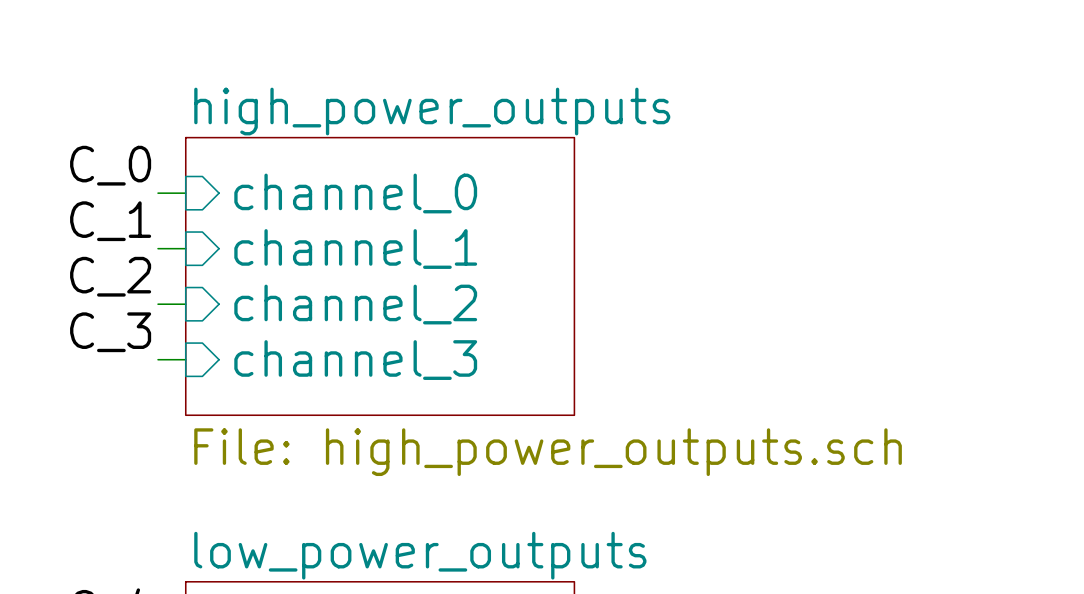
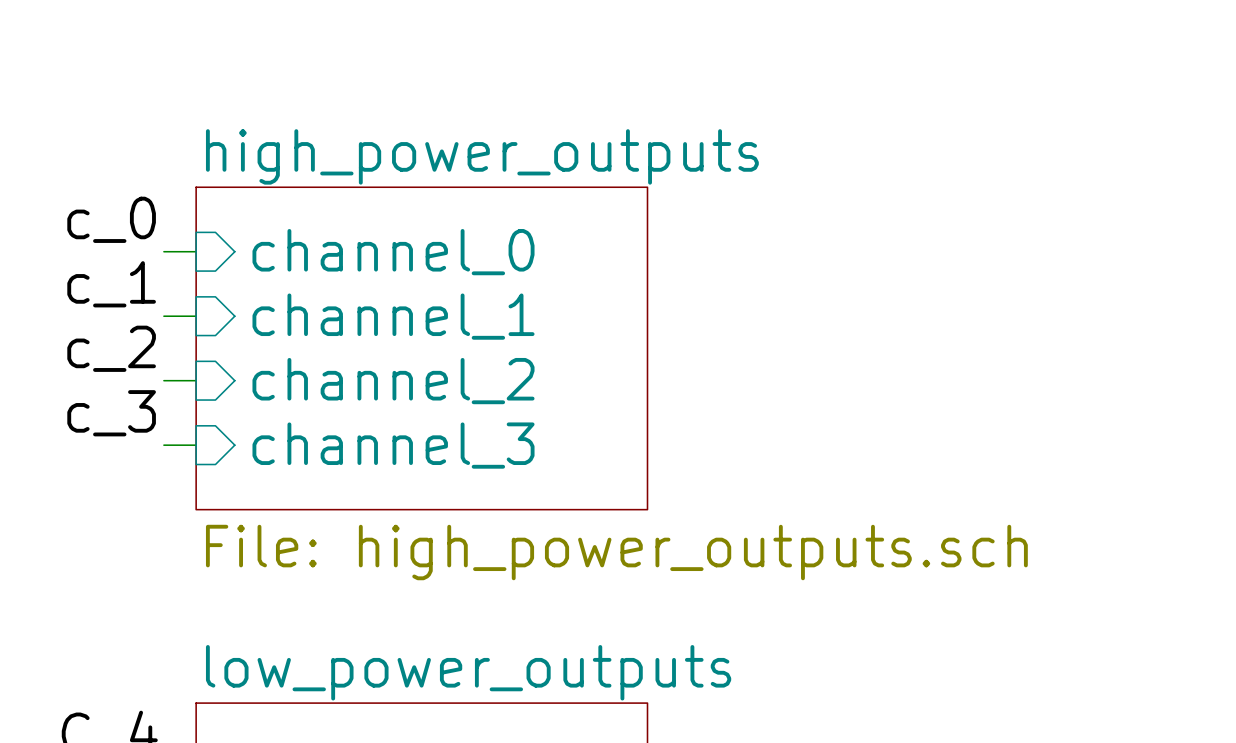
label: C_0 (110, 165) -> c_0 (111, 219)
label: C_1 (110, 221) -> c_1 (111, 284)
label: C_2 (110, 276) -> c_2 (111, 348)
label: C_3 (110, 332) -> c_3 (111, 413)

